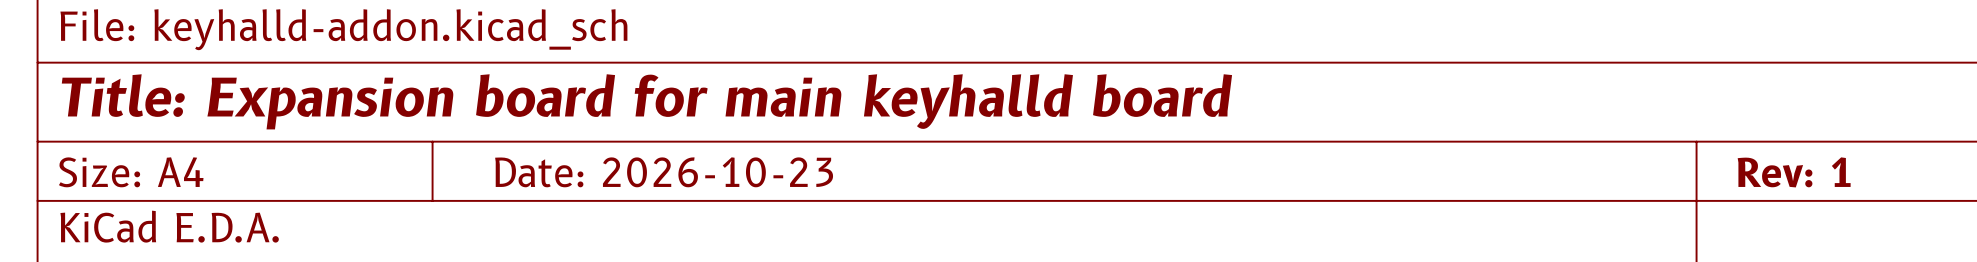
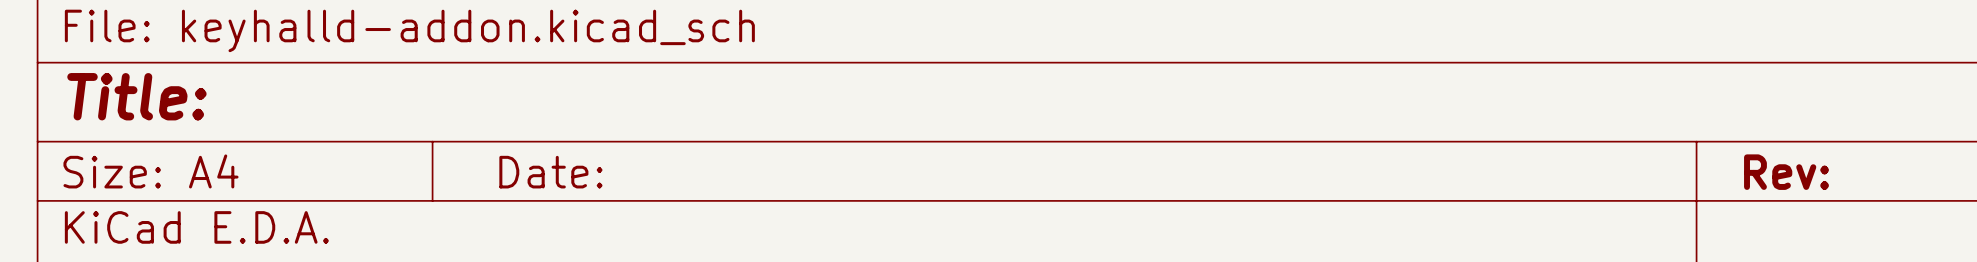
title block: Title: Expansion board for main keyhalld board (646, 101) -> Title: (136, 96)
title block: Date: 2026-10-23 (664, 172) -> Date: (550, 172)
title block: Rev: 1 (1794, 172) -> Rev: (1786, 172)

